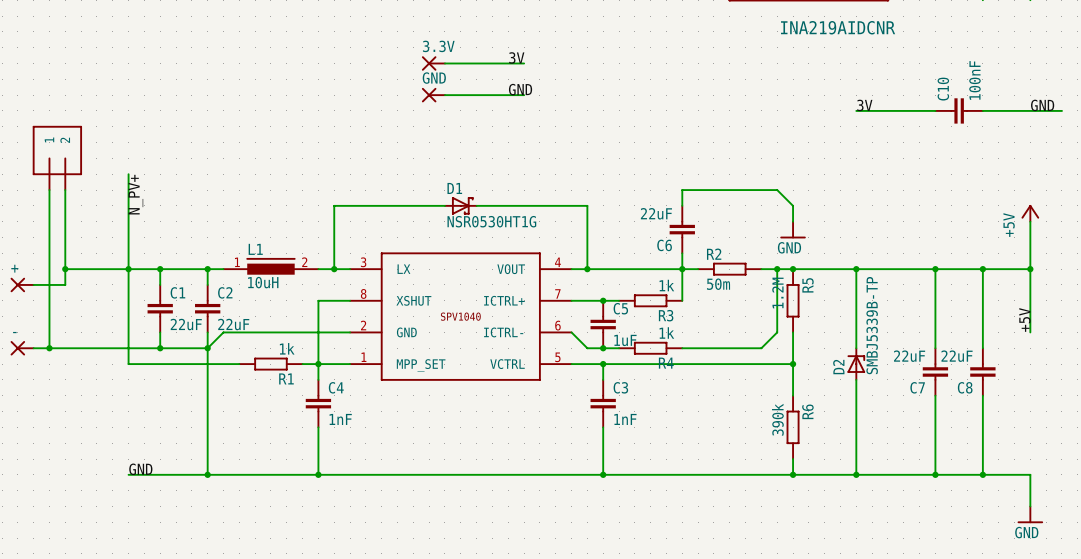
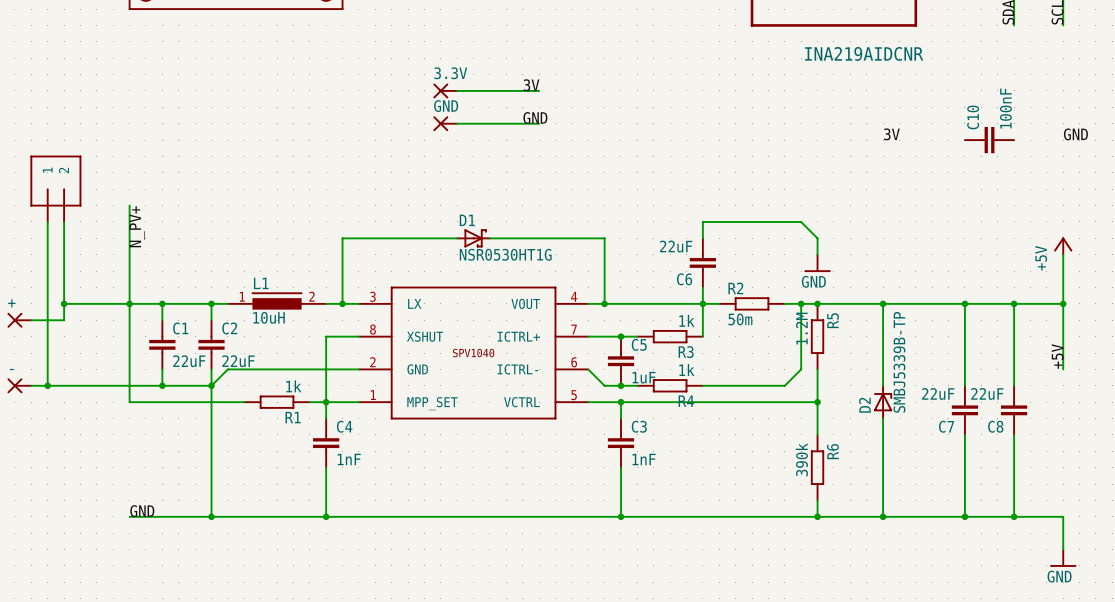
wire: (856, 110) (935, 110) -> none
wire: (982, 110) (1061, 110) -> none

